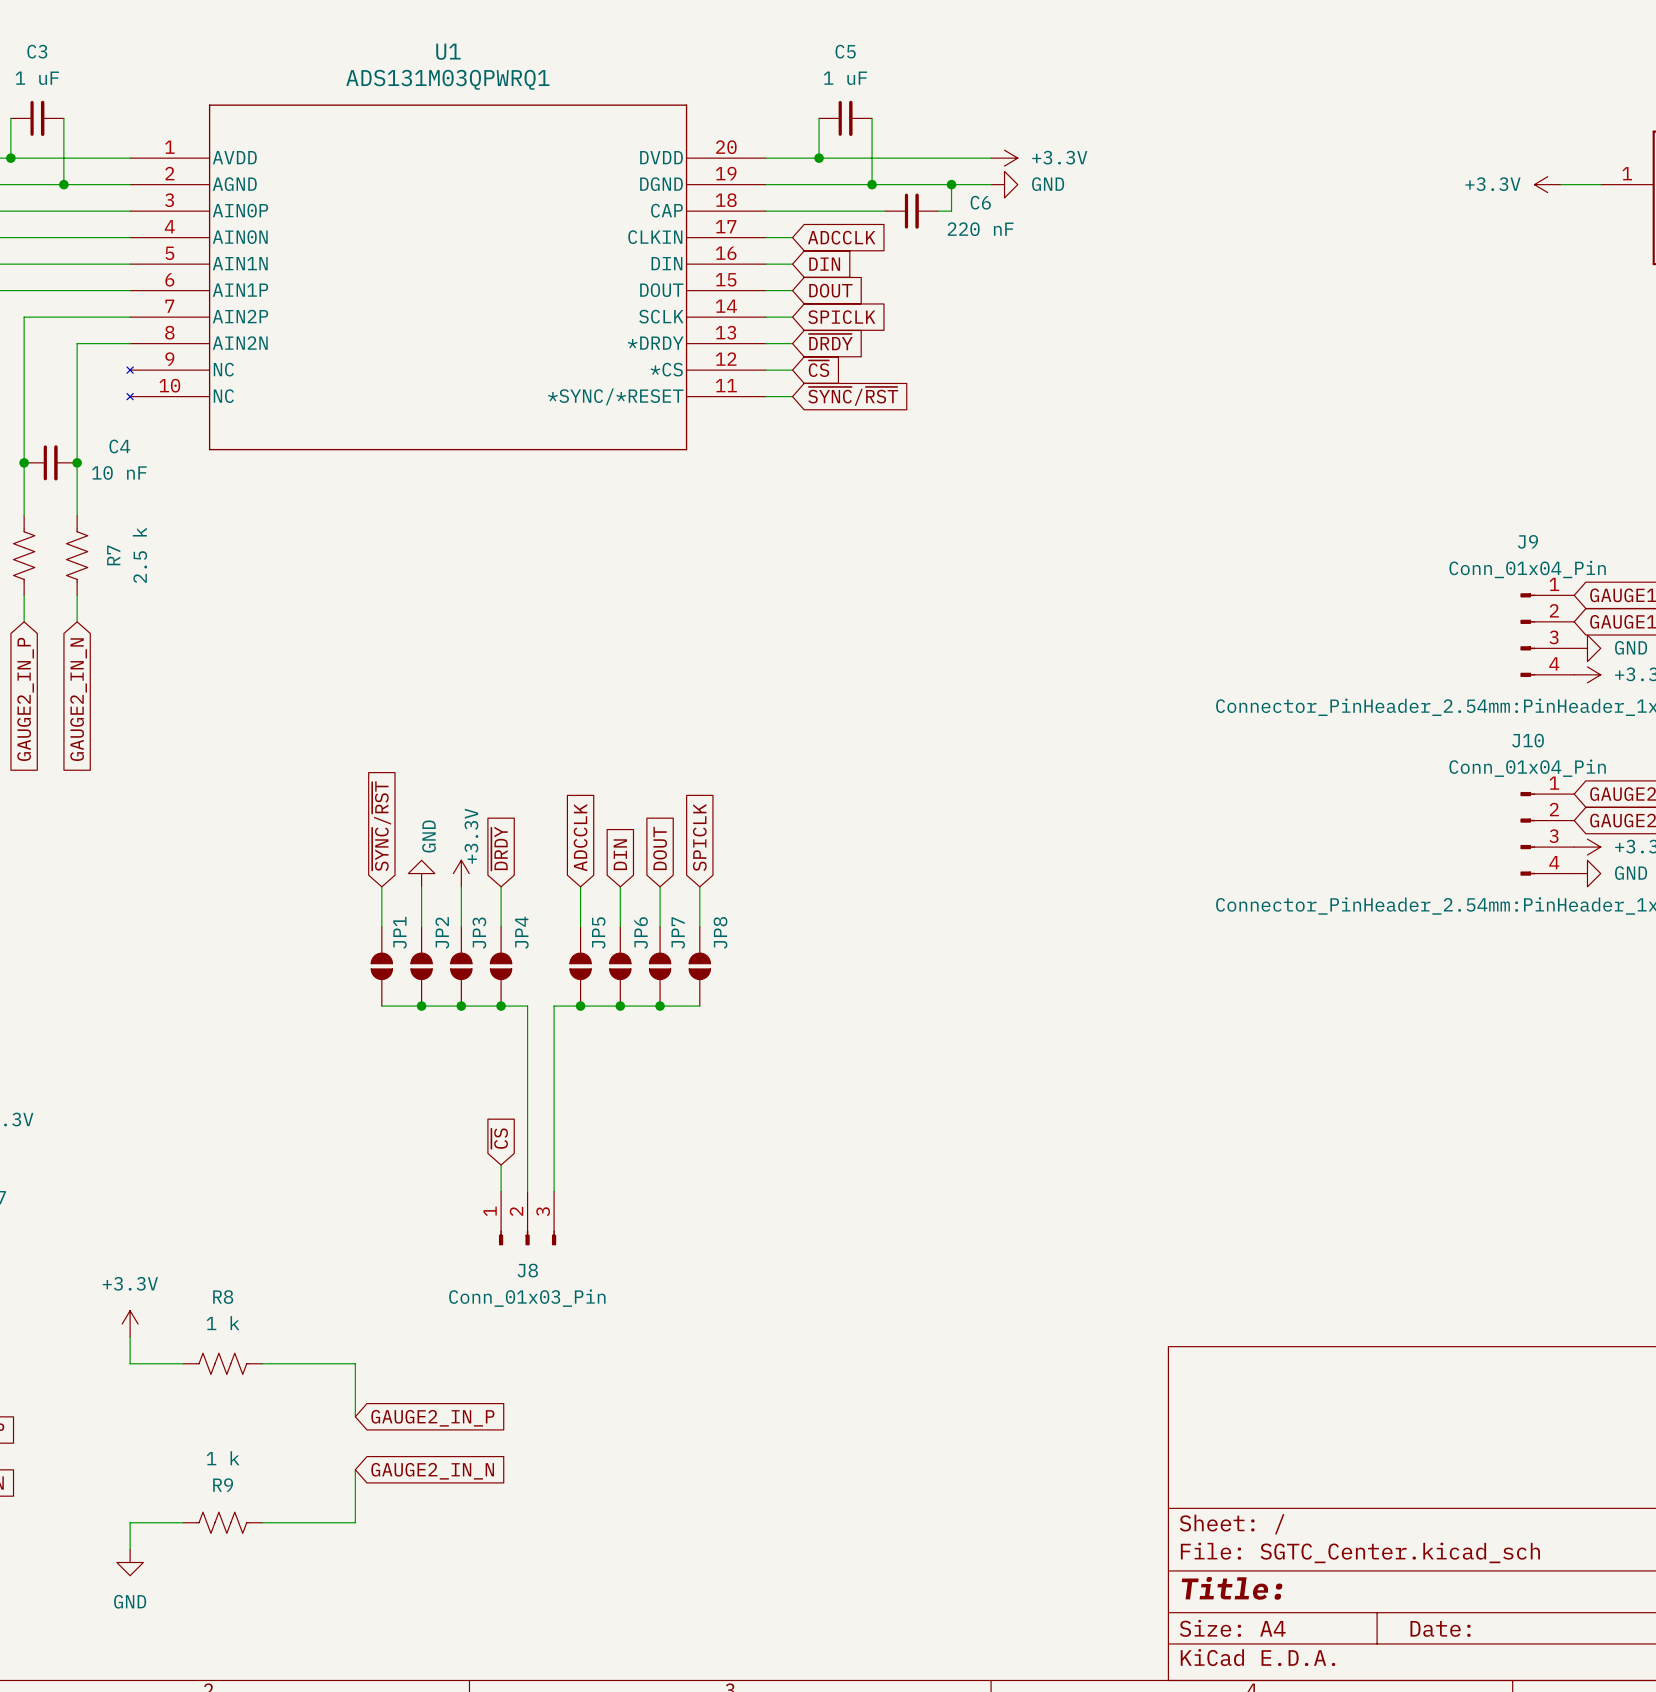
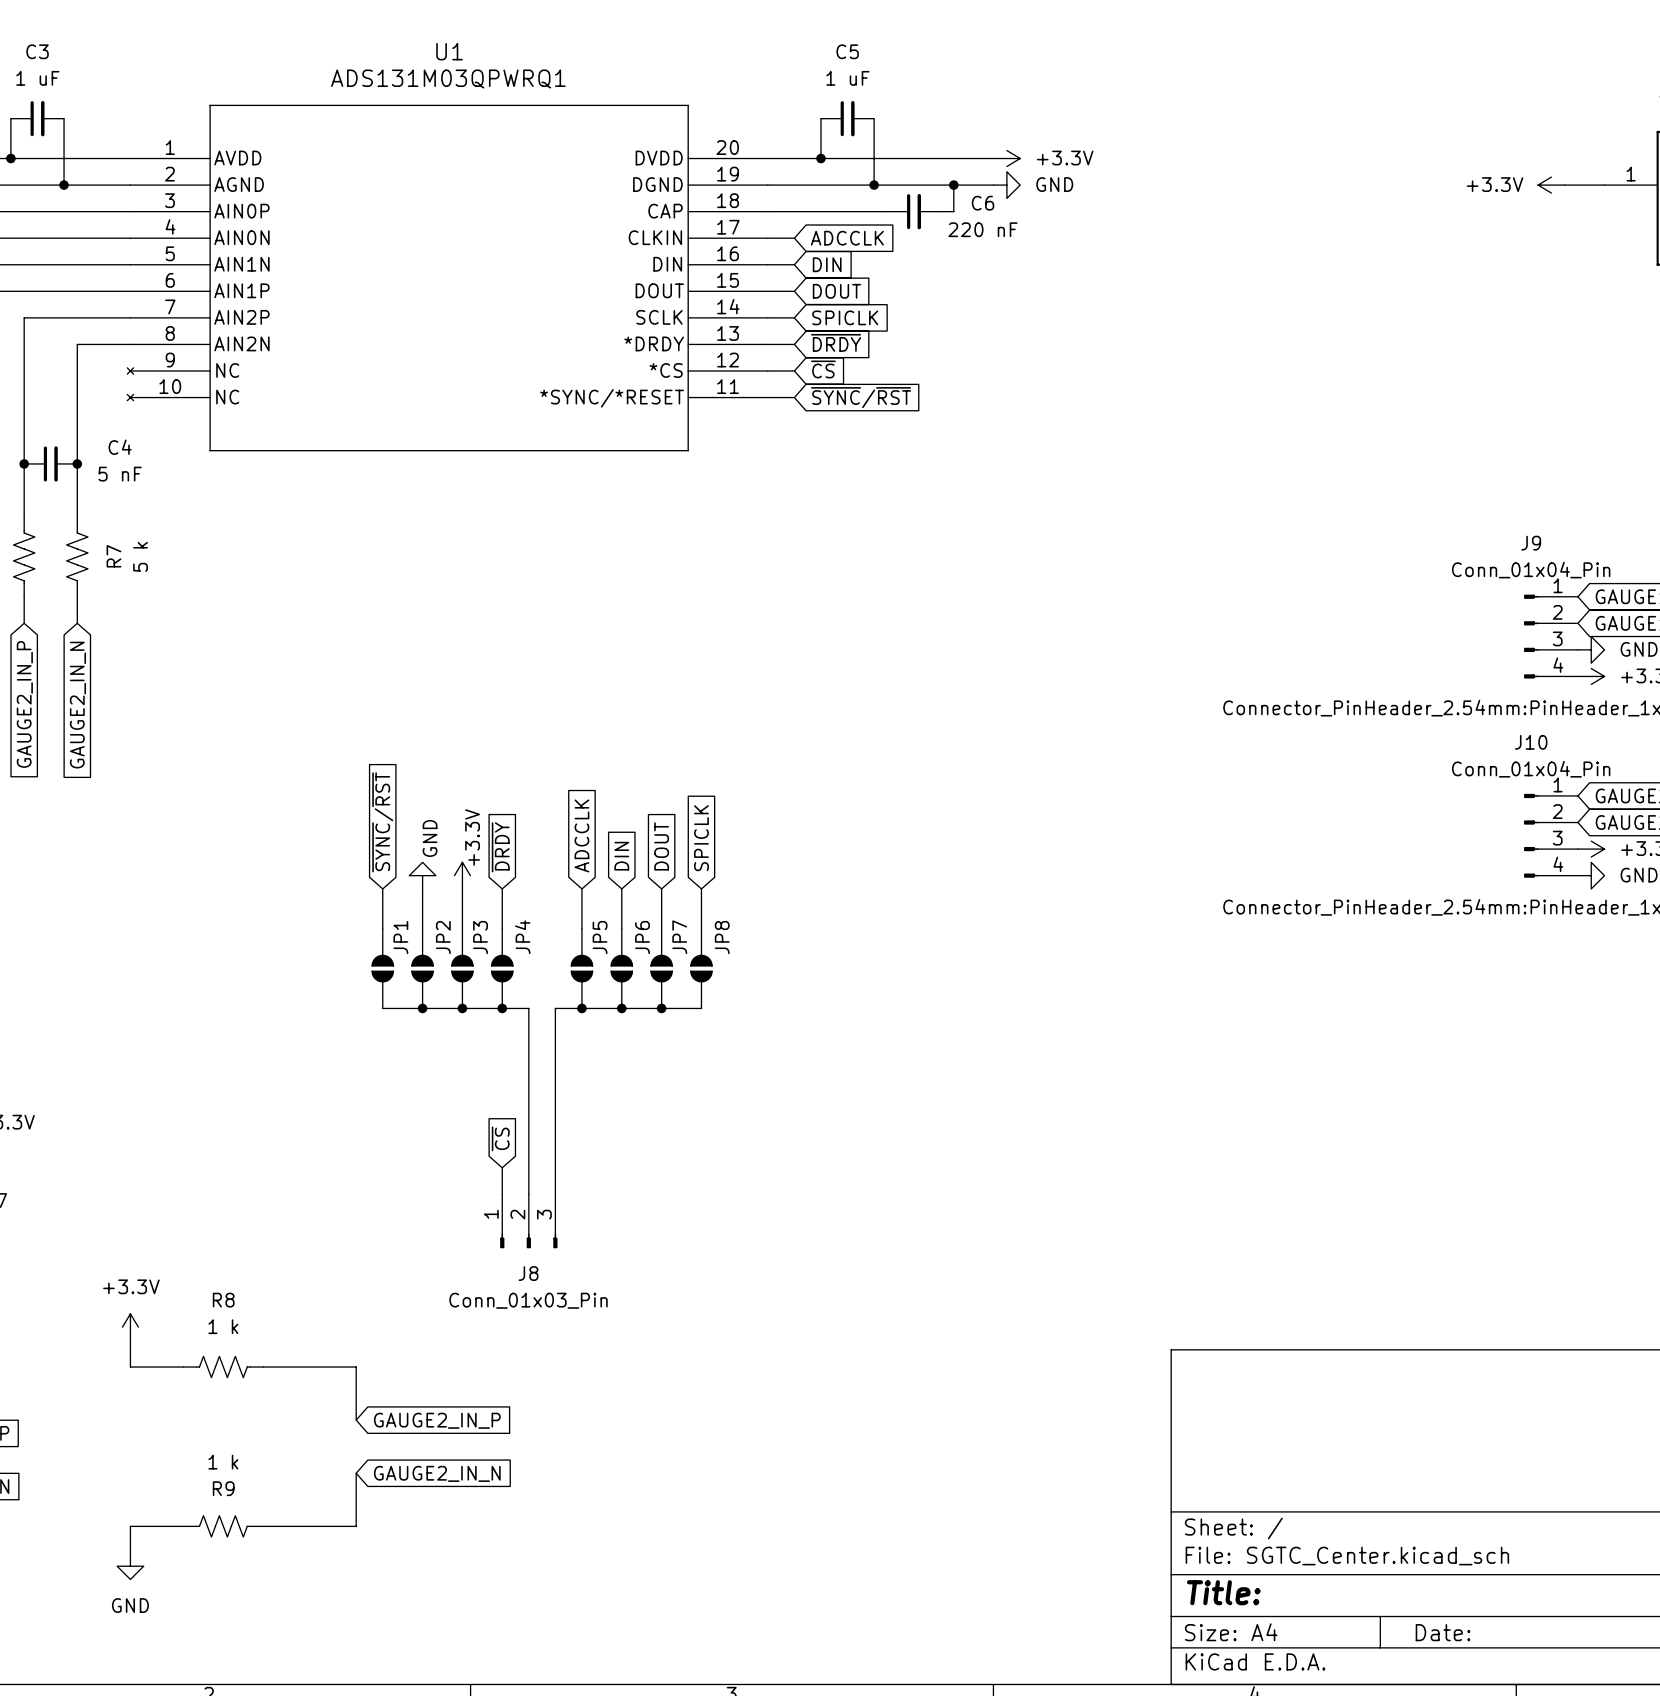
C4 value: 10 nF (119, 472) -> 5 nF (120, 474)
R7 value: 2.5 k (139, 555) -> 5 k (140, 556)

